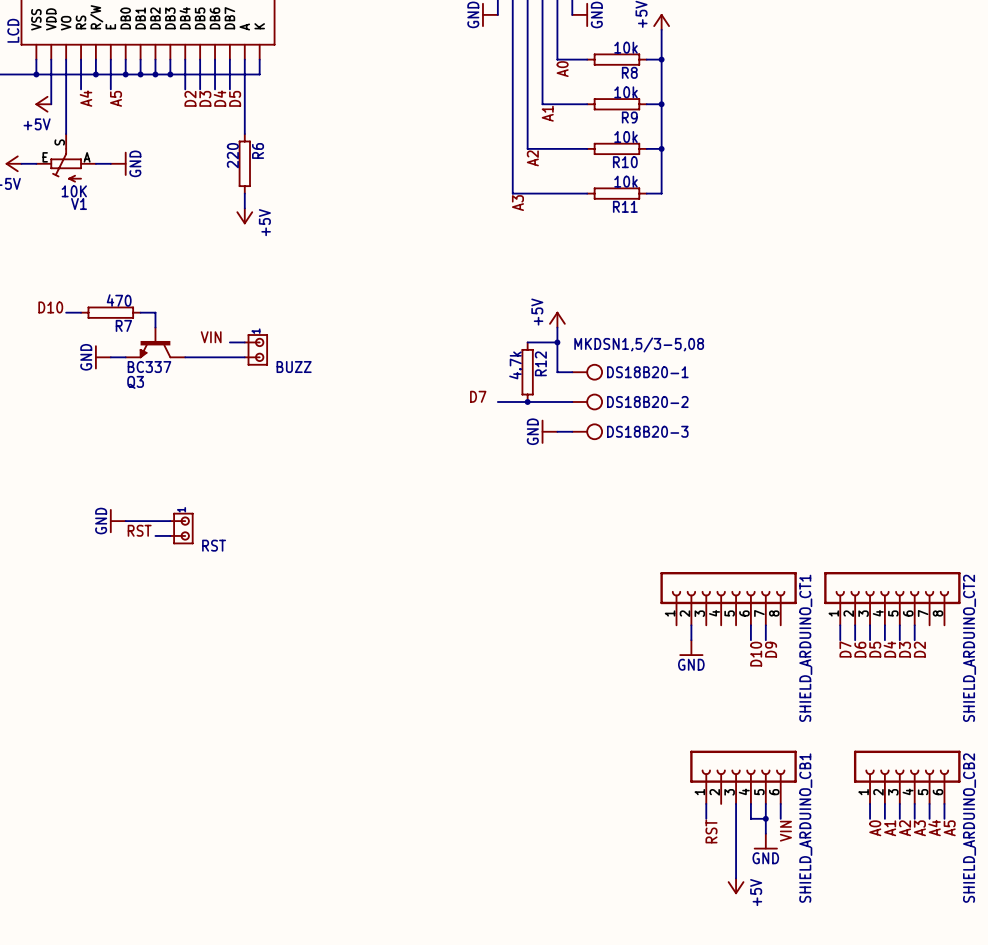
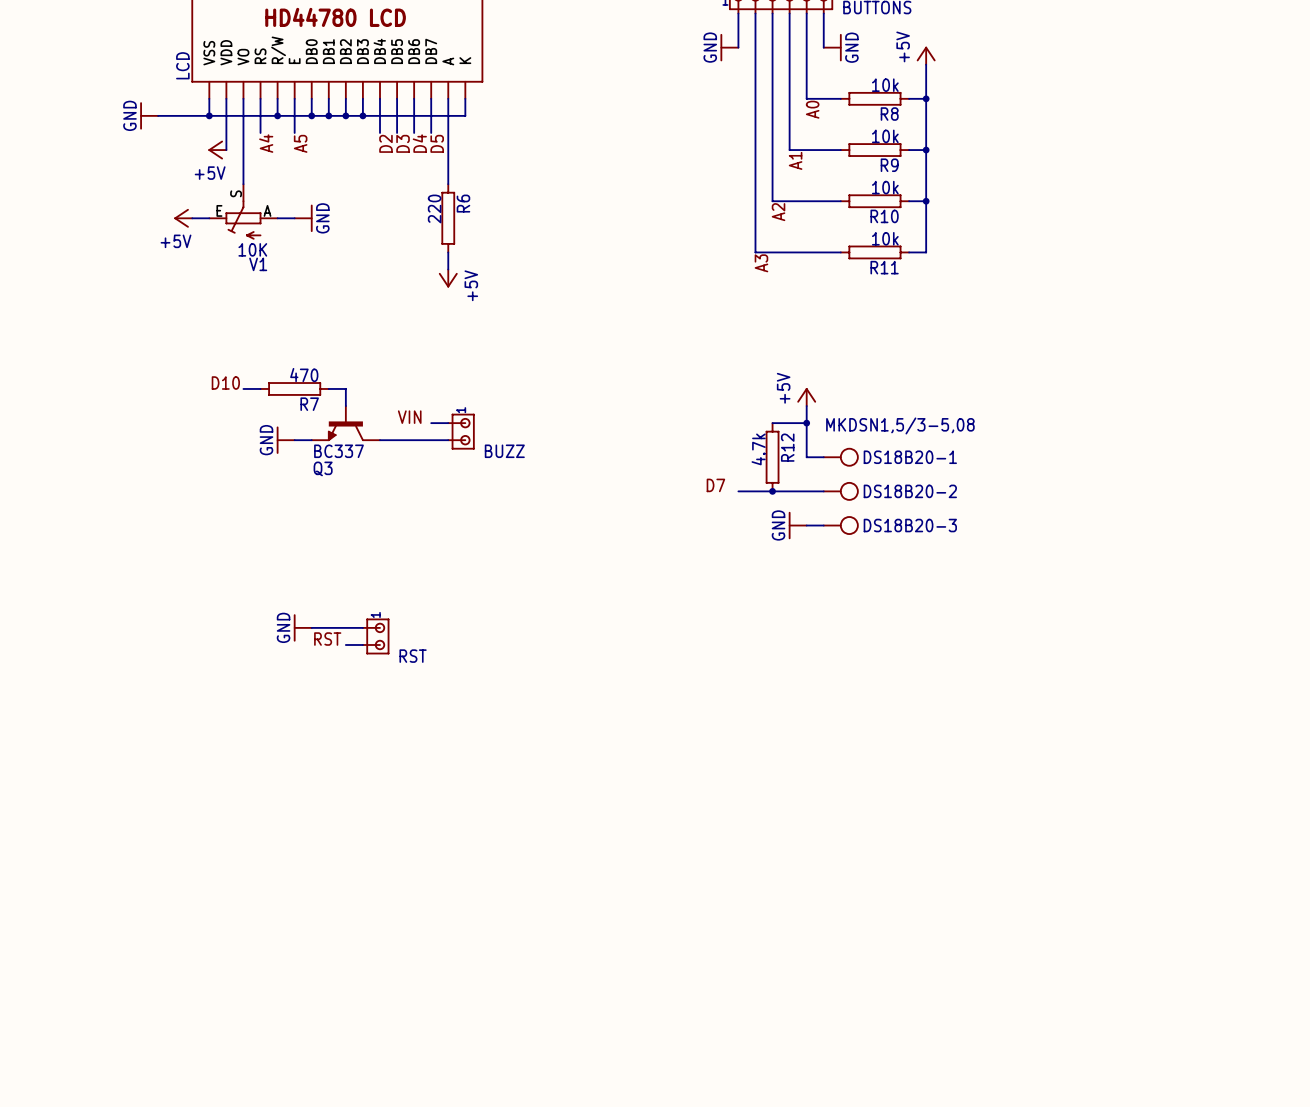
SHIELD_ARDUINO_CT1: (728, 598) -> none
SHIELD_ARDUINO_CT2: (892, 598) -> none
wire: (691, 625) (691, 640) -> none
wire: (750, 625) (750, 640) -> none
wire: (765, 625) (765, 640) -> none
wire: (840, 625) (840, 640) -> none
wire: (855, 625) (855, 640) -> none
wire: (870, 625) (870, 640) -> none
wire: (884, 625) (884, 640) -> none
wire: (899, 625) (899, 640) -> none
wire: (914, 625) (914, 640) -> none
power symbol: GND (691, 648) -> none
label: D9 (771, 649) -> none
label: D7 (845, 649) -> none
label: D6 (860, 649) -> none
label: D5 (875, 649) -> none
label: D4 (889, 649) -> none
label: D3 (905, 649) -> none
label: D2 (919, 649) -> none
label: D10 (756, 654) -> none
SHIELD_ARDUINO_CB1: (743, 777) -> none
SHIELD_ARDUINO_CB2: (907, 777) -> none
wire: (706, 803) (706, 818) -> none
wire: (736, 803) (736, 878) -> none
wire: (750, 803) (750, 818) (765, 818) -> none
wire: (765, 803) (765, 833) -> none
wire: (780, 803) (780, 818) -> none
wire: (870, 803) (870, 818) -> none
wire: (884, 803) (884, 818) -> none
wire: (899, 803) (899, 818) -> none
wire: (914, 803) (914, 818) -> none
wire: (929, 803) (929, 818) -> none
wire: (944, 803) (944, 818) -> none
junction: (765, 818) -> none
label: A0 (875, 828) -> none
label: A1 (890, 828) -> none
label: A2 (905, 828) -> none
label: A3 (919, 828) -> none
label: A4 (934, 828) -> none
label: A5 (949, 828) -> none
label: RST (711, 831) -> none
label: VIN (785, 831) -> none
power symbol: GND (765, 841) -> none
power symbol: +5V (736, 886) -> none

